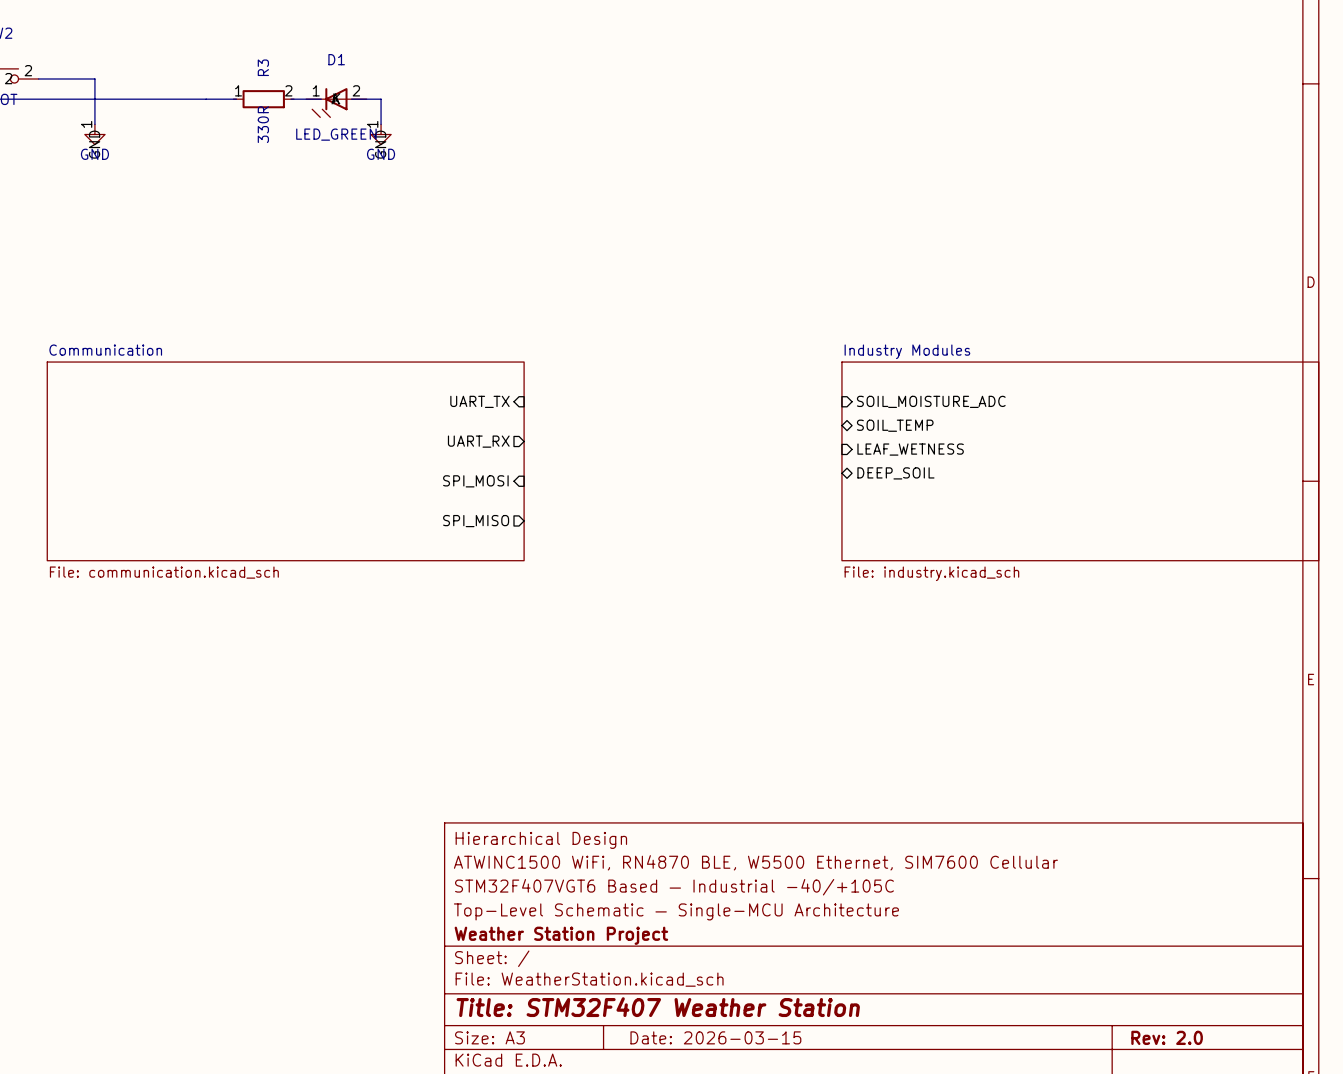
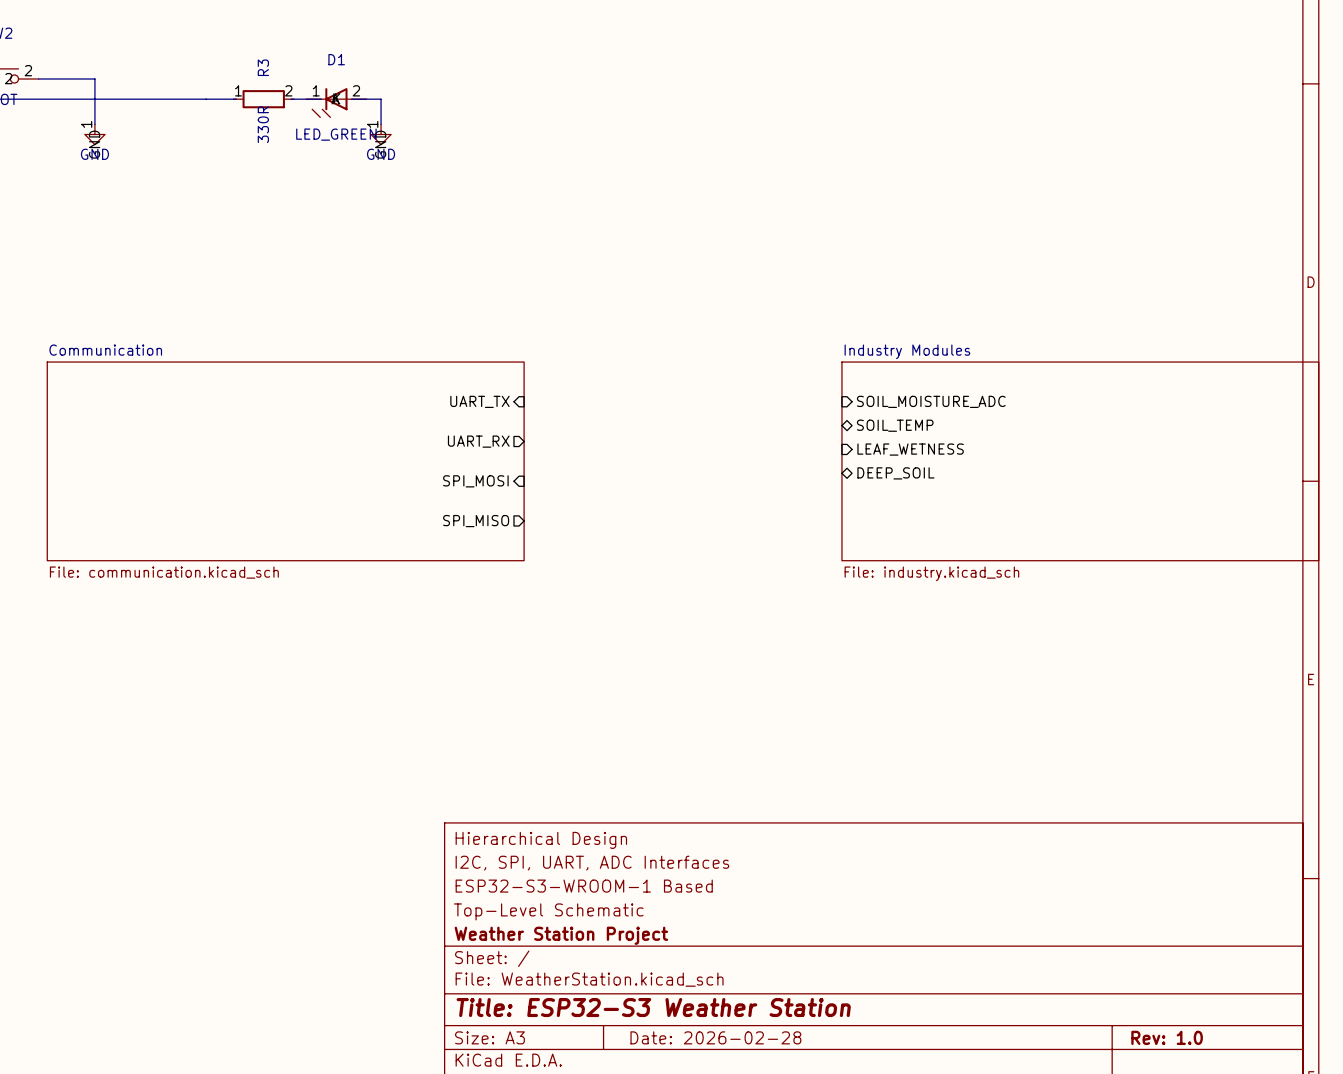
title block: ATWINC1500 WiFi, RN4870 BLE, W5500 Ethernet, SIM7600 Cellular (755, 862) -> I2C, SPI, UART, ADC Interfaces (592, 863)
title block: STM32F407VGT6 Based — Industrial -40/+105C (674, 887) -> ESP32-S3-WROOM-1 Based (584, 886)
title block: Top-Level Schematic — Single-MCU Architecture (676, 911) -> Top-Level Schematic (548, 911)
title block: Title: STM32F407 Weather Station (658, 1007) -> Title: ESP32-S3 Weather Station (653, 1007)
title block: Date: 2026-03-15 (715, 1037) -> Date: 2026-02-28 (715, 1037)
title block: Rev: 2.0 (1167, 1037) -> Rev: 1.0 (1167, 1037)

